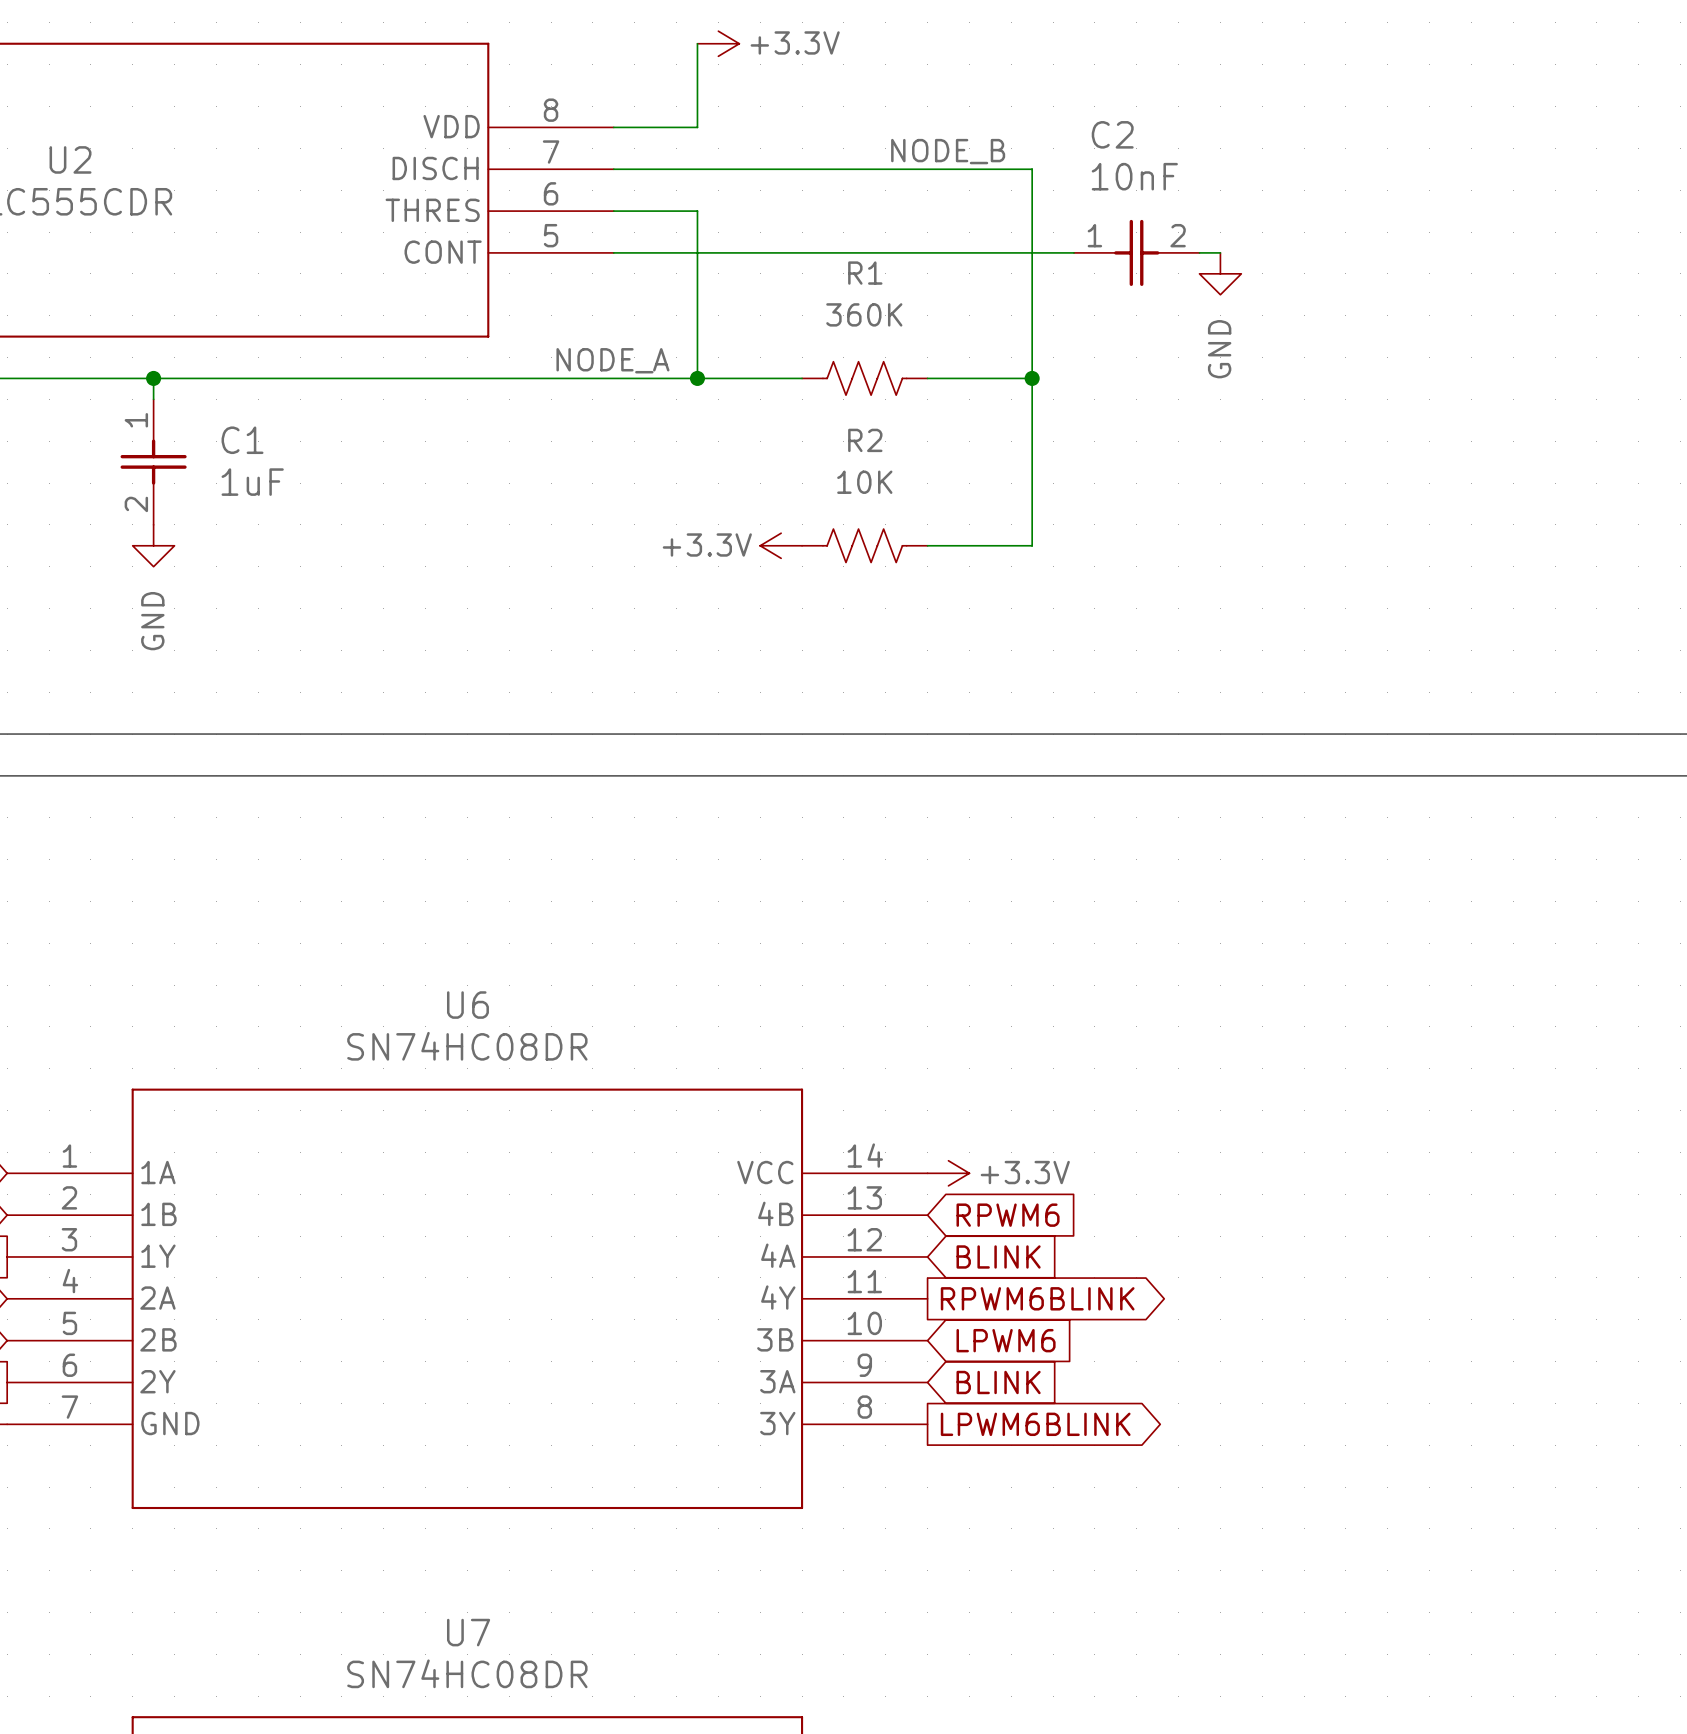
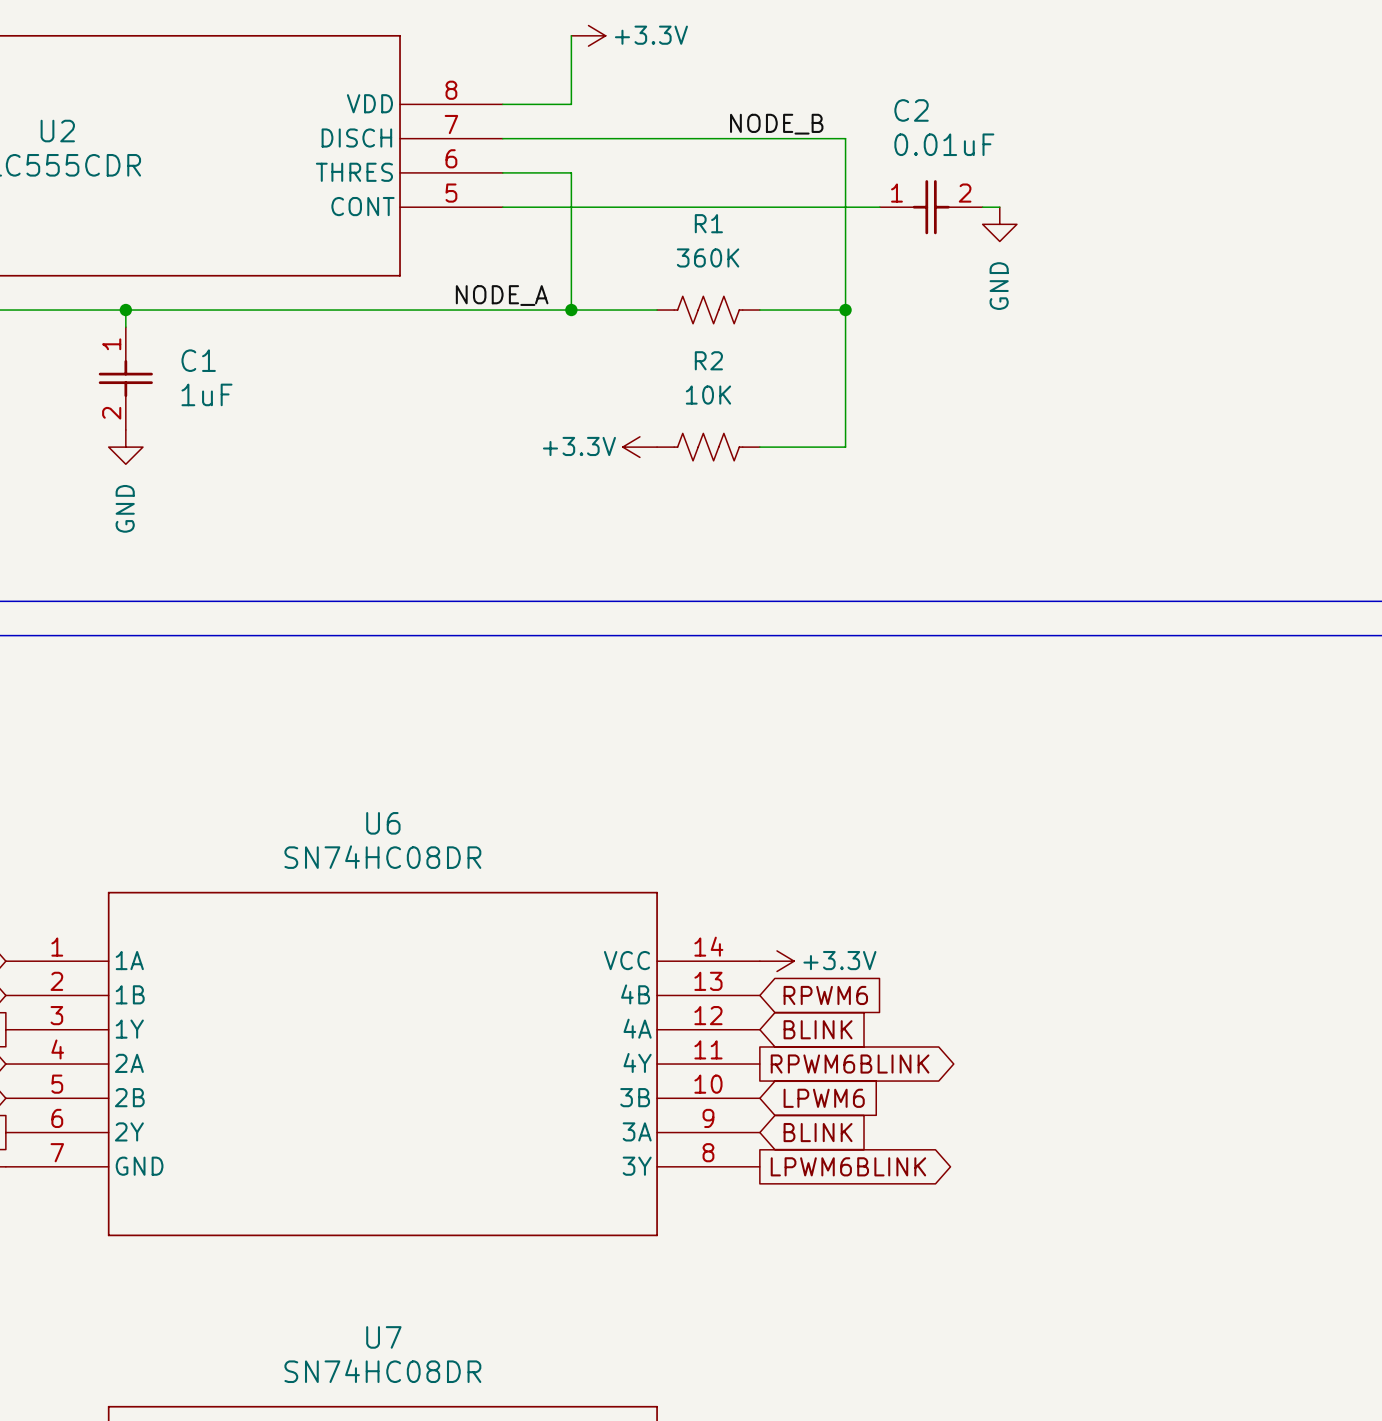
C2 value: 10nF (1134, 176) -> 0.01uF (944, 144)

